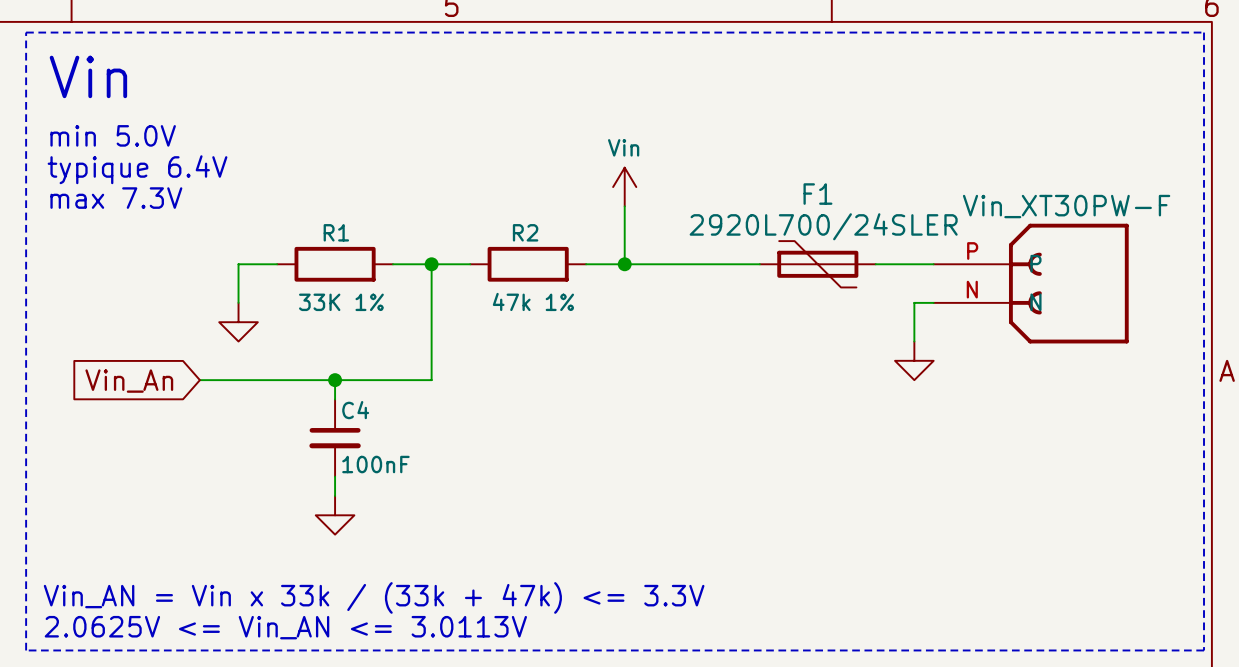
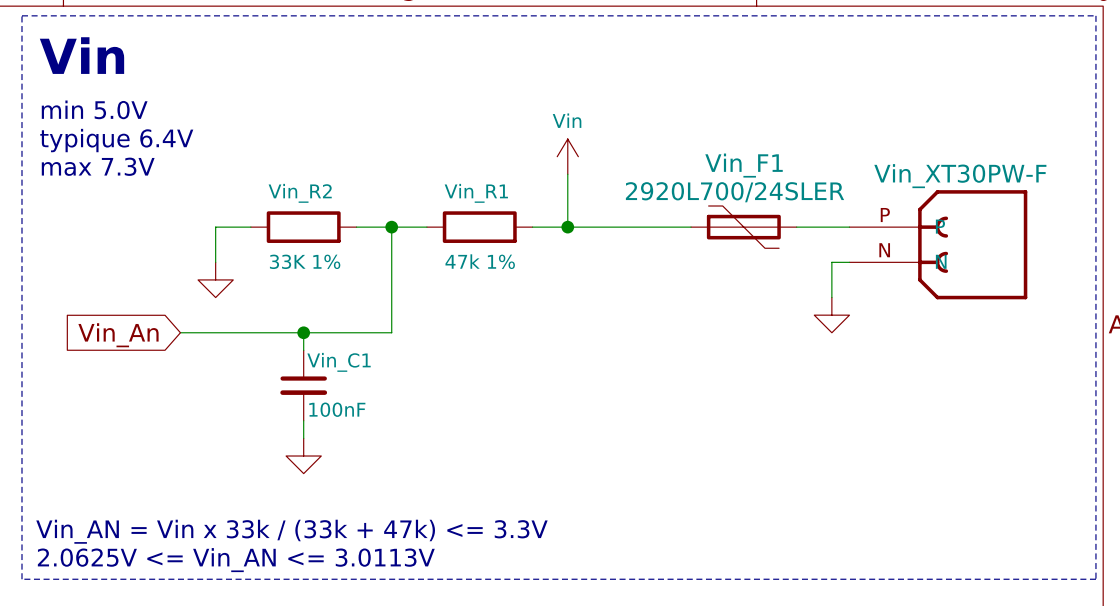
F1 name: F1 (817, 194) -> Vin_F1 (744, 165)
R1 name: R1 (336, 232) -> Vin_R2 (300, 193)
R2 name: R2 (525, 232) -> Vin_R1 (476, 193)
C4 name: C4 (355, 410) -> Vin_C1 (339, 362)

